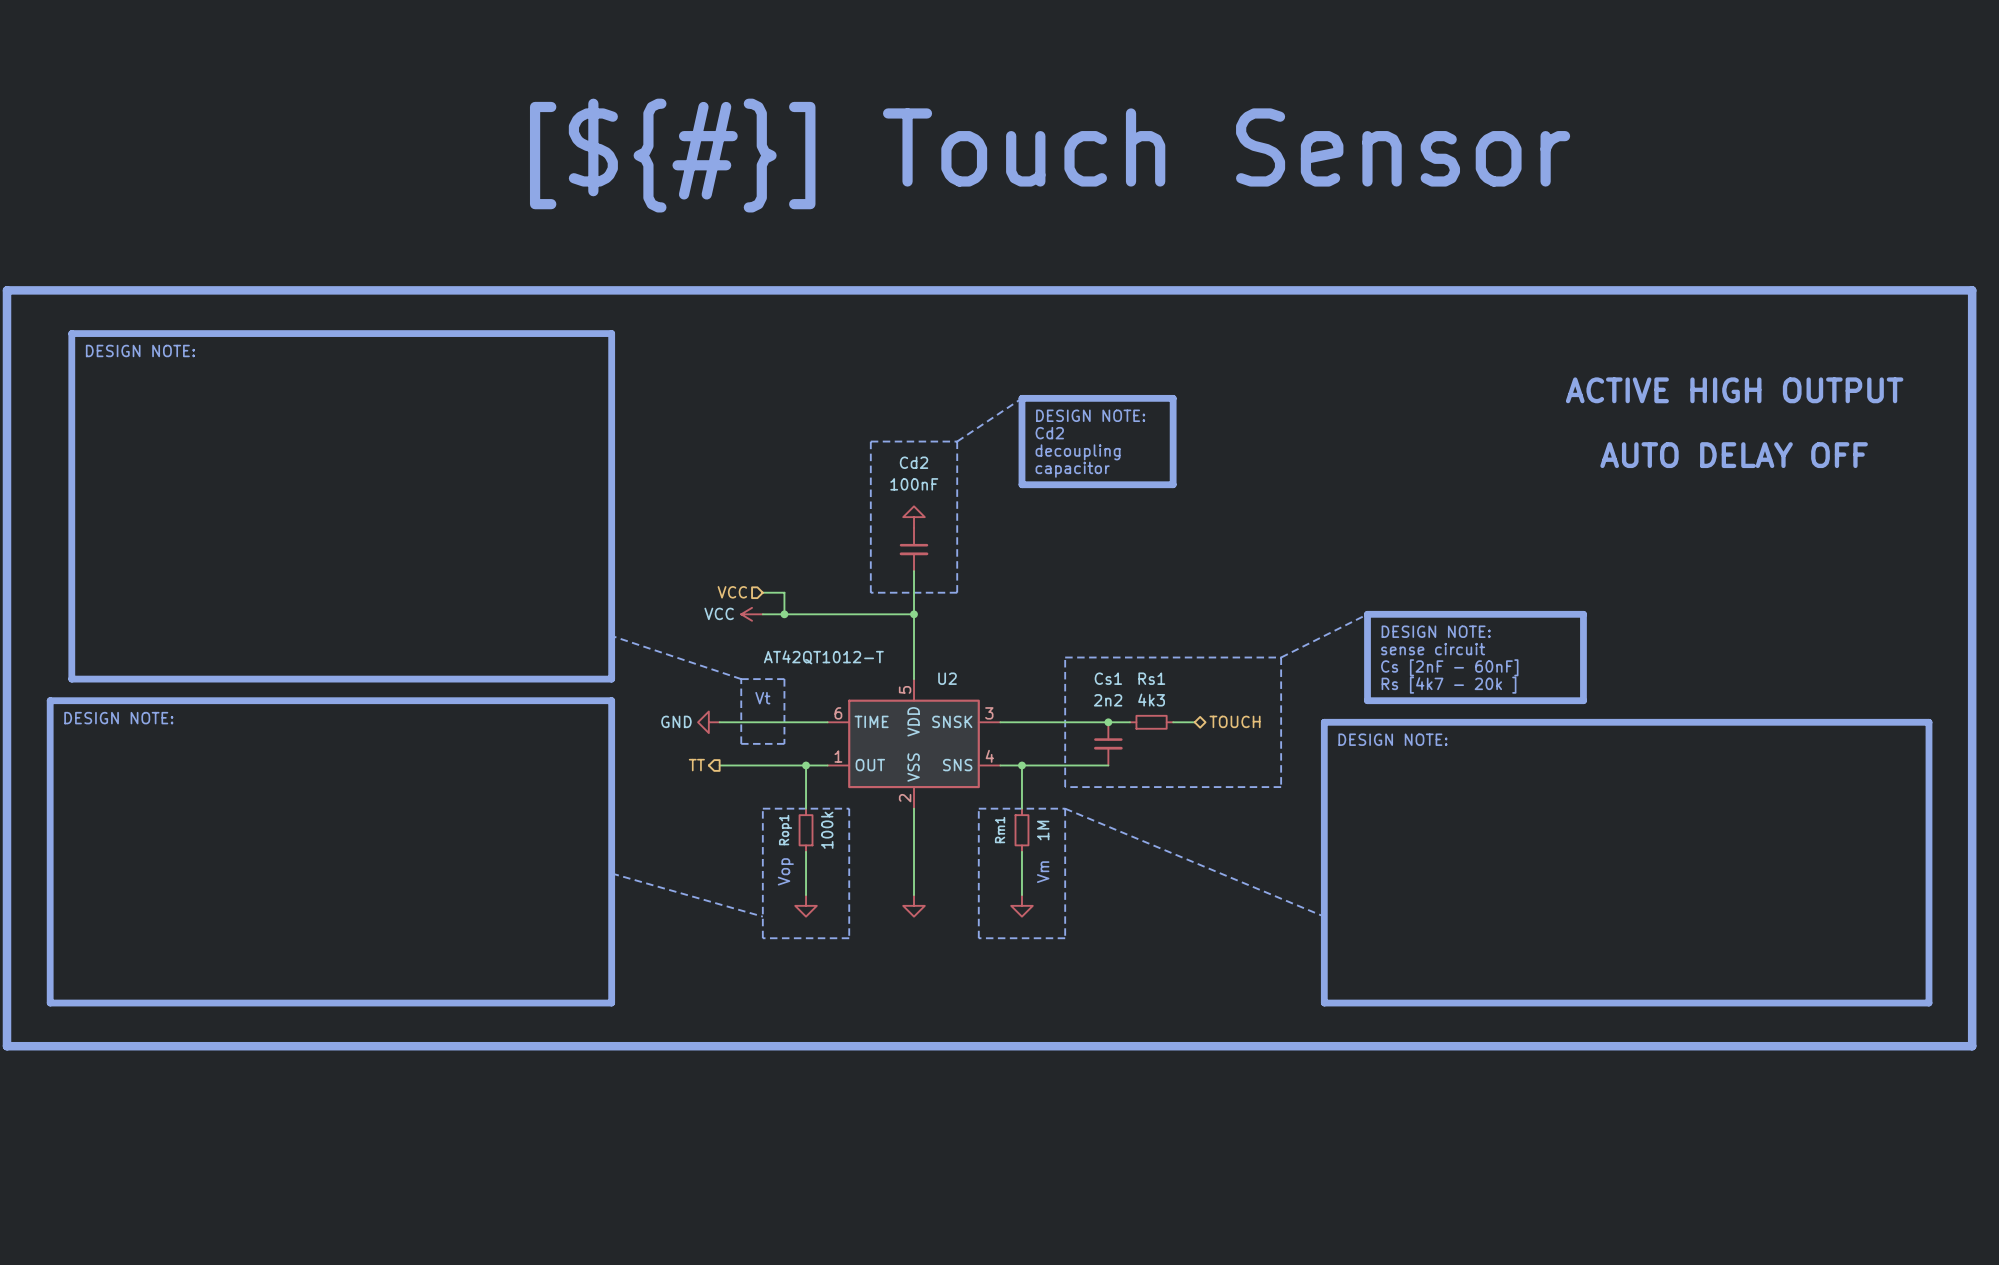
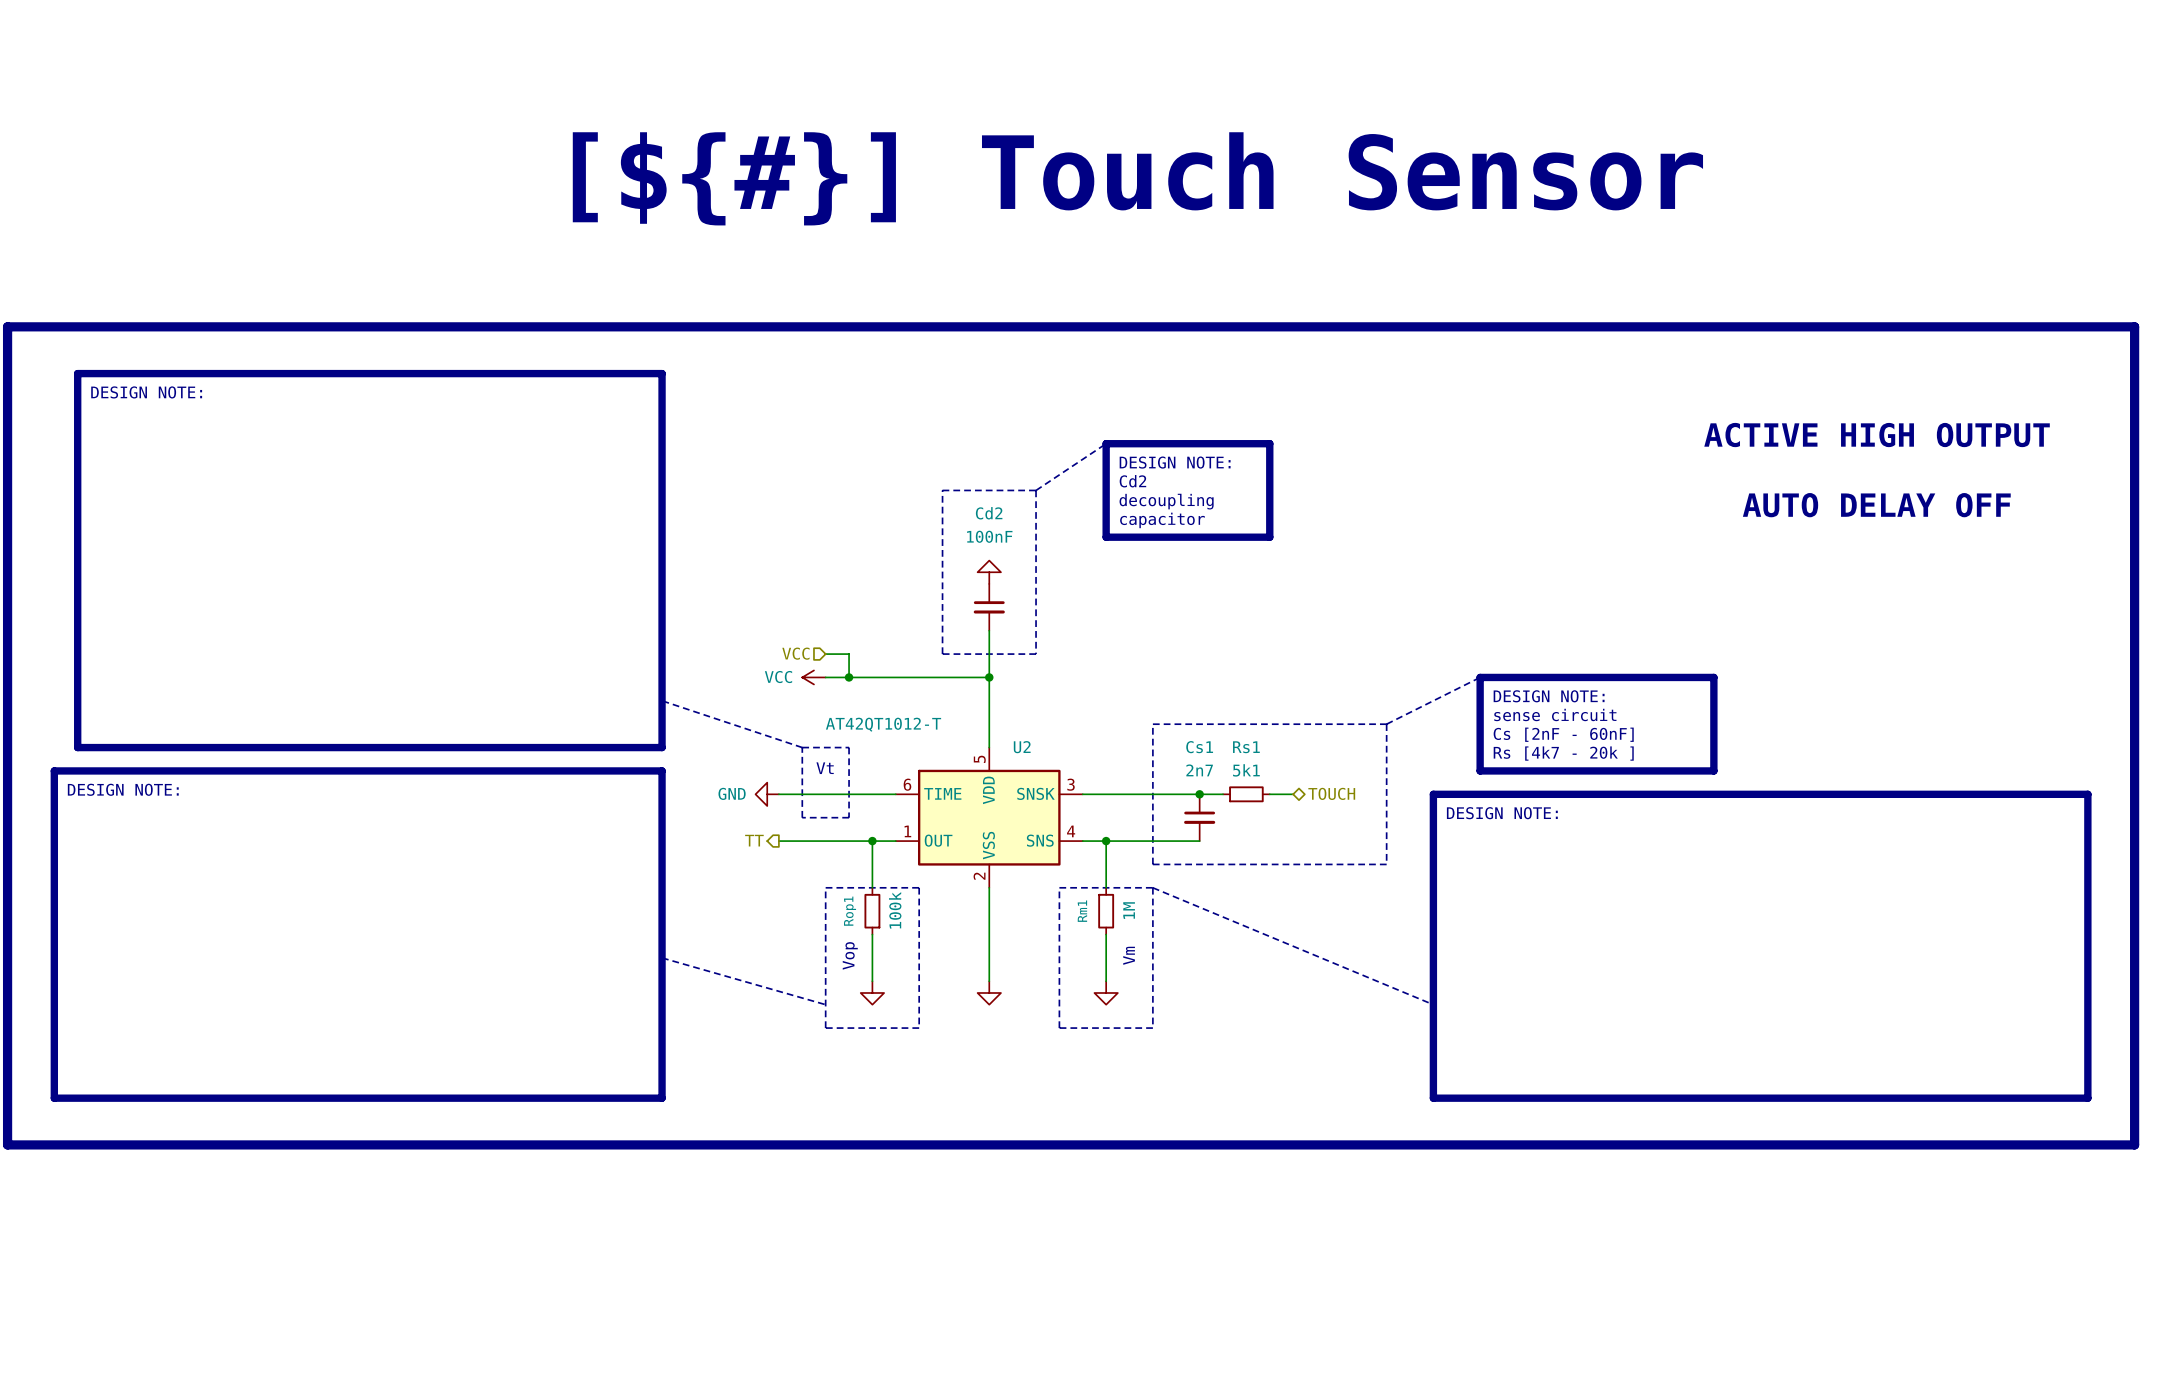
Cs1 value: 2n2 (1108, 700) -> 2n7 (1199, 770)
Rs1 value: 4k3 (1151, 700) -> 5k1 (1246, 770)

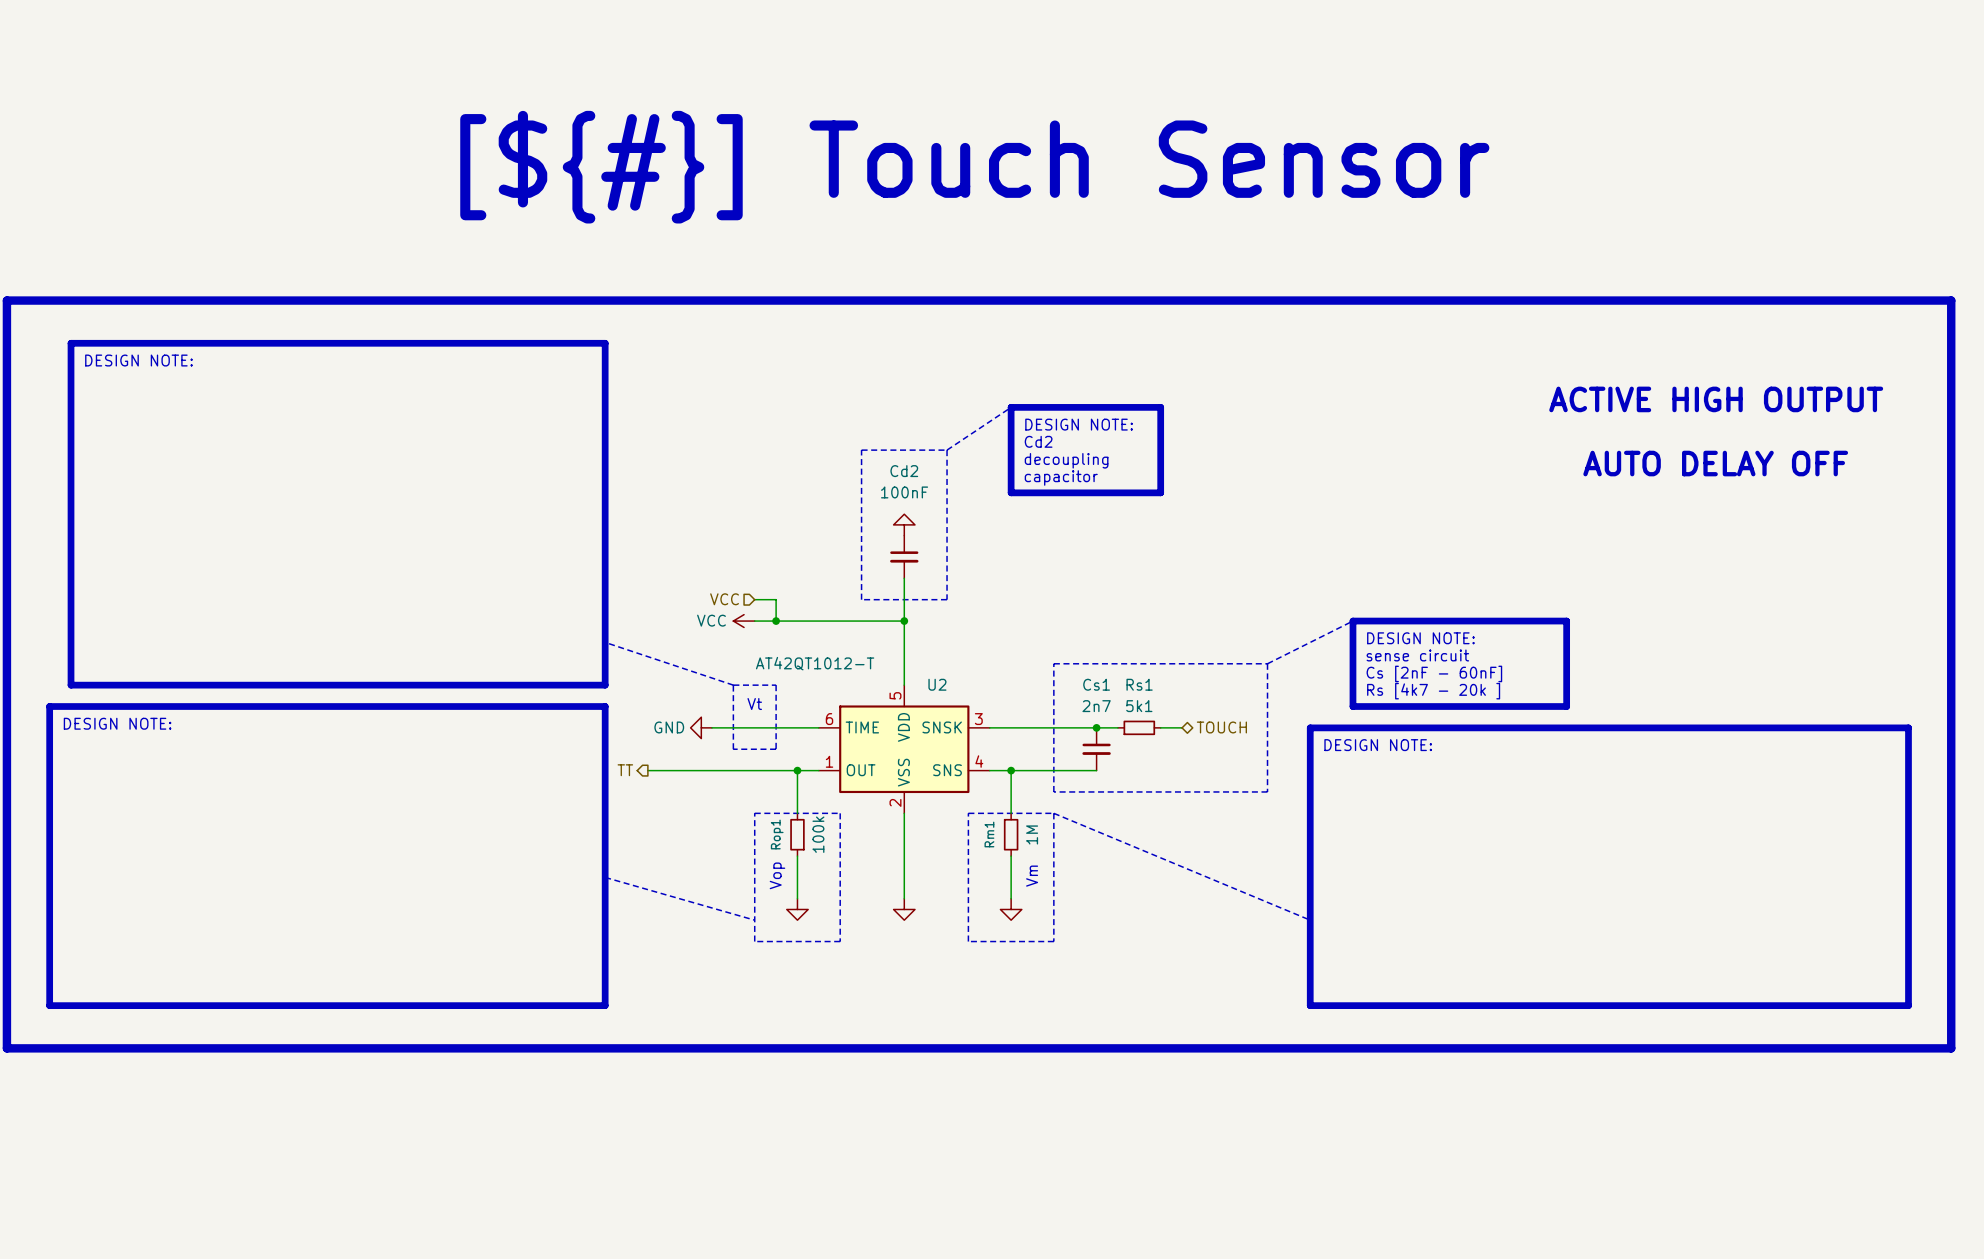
text position: [${#}] Touch Sensor (1137, 178) -> [${#}] Touch Sensor (974, 167)
hierarchical label position: TT (754, 840) -> TT (625, 770)
wire: none -> (647, 770) (712, 770)

